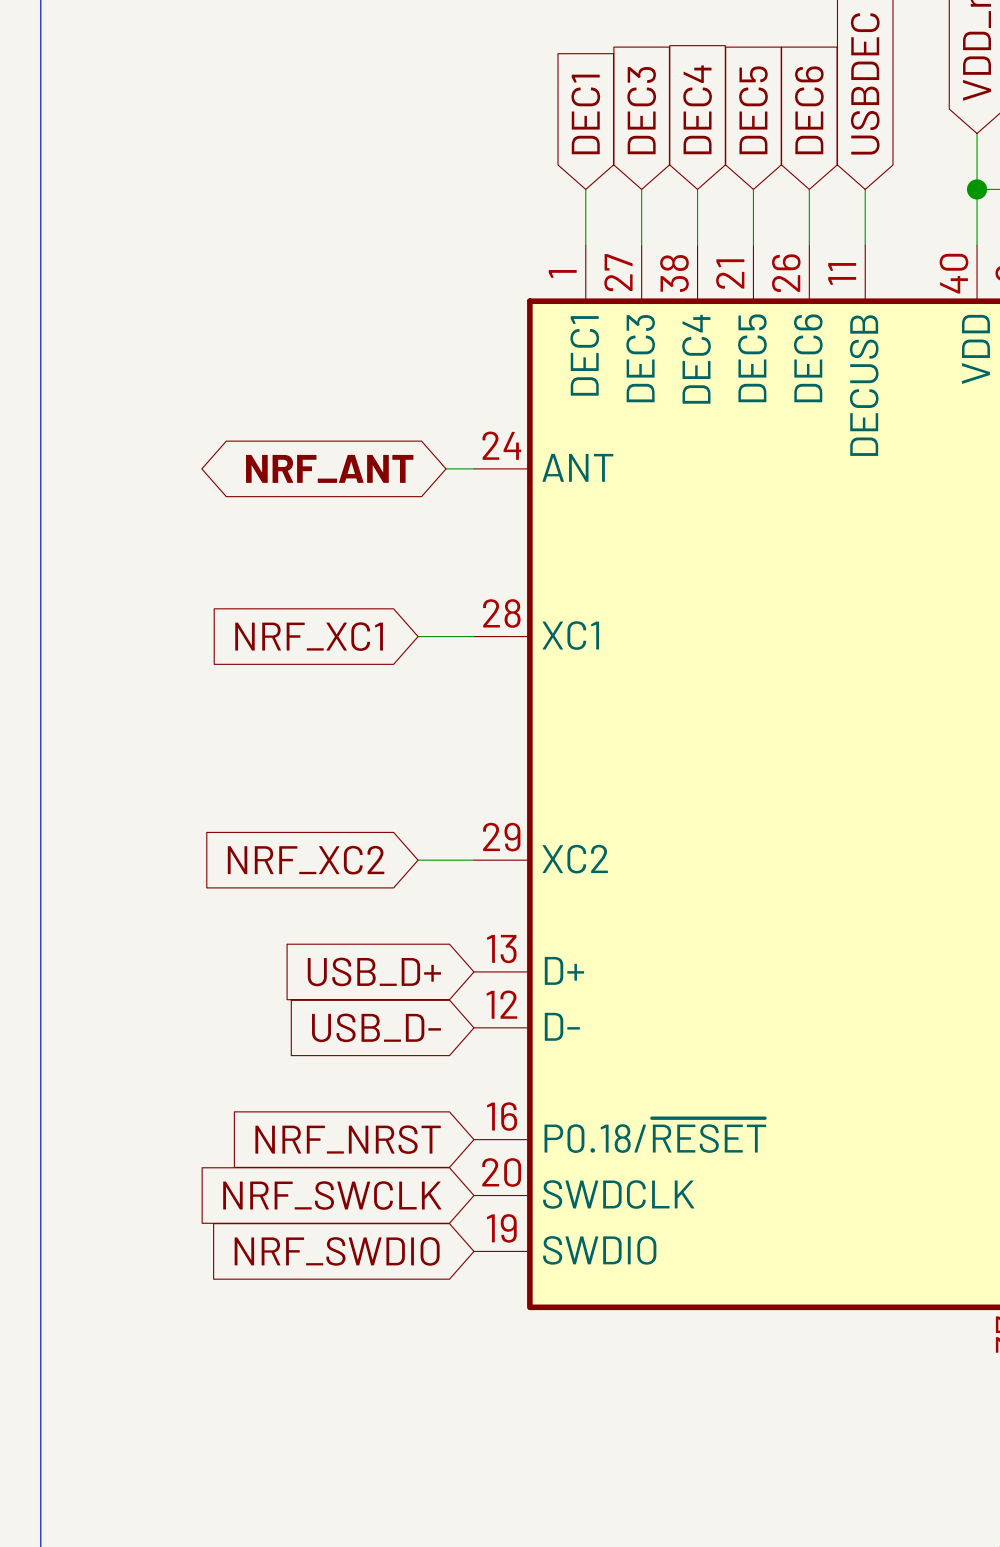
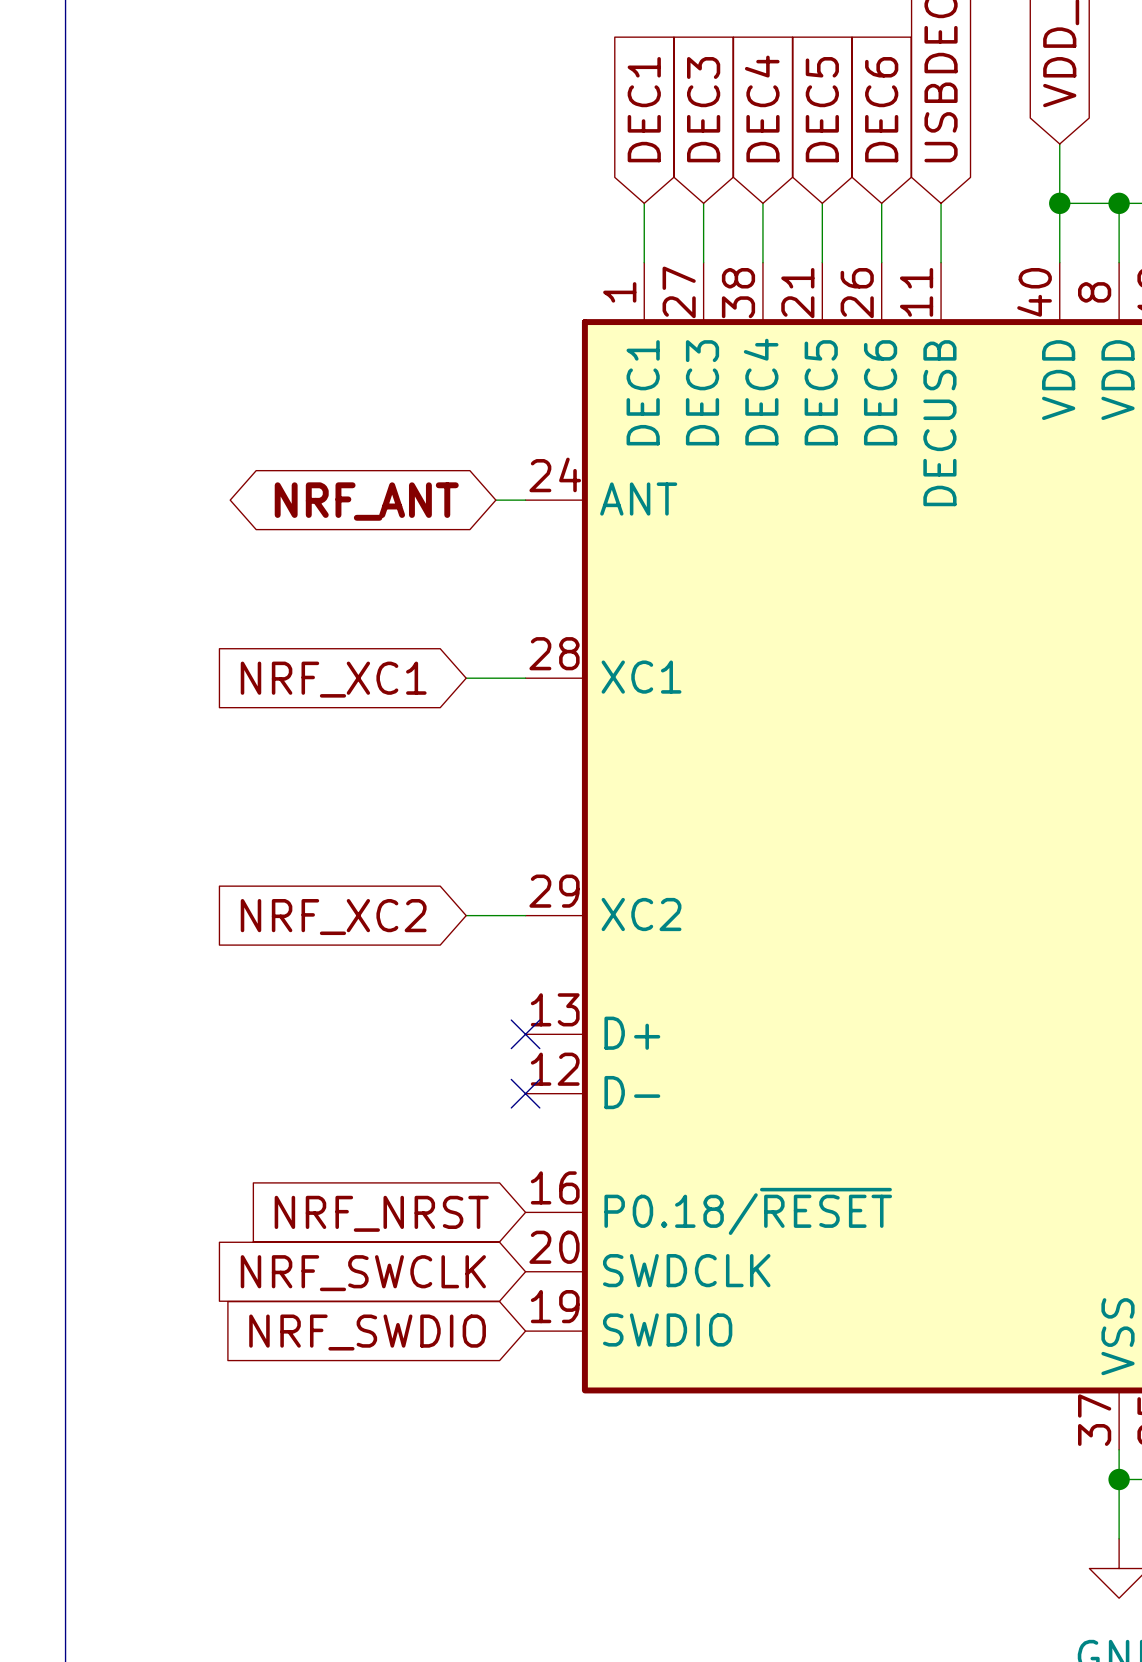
global label: USB_D+ (374, 971) -> none
no-connect mark: none -> (525, 1034)
global label: USB_D- (376, 1027) -> none
no-connect mark: none -> (525, 1093)

